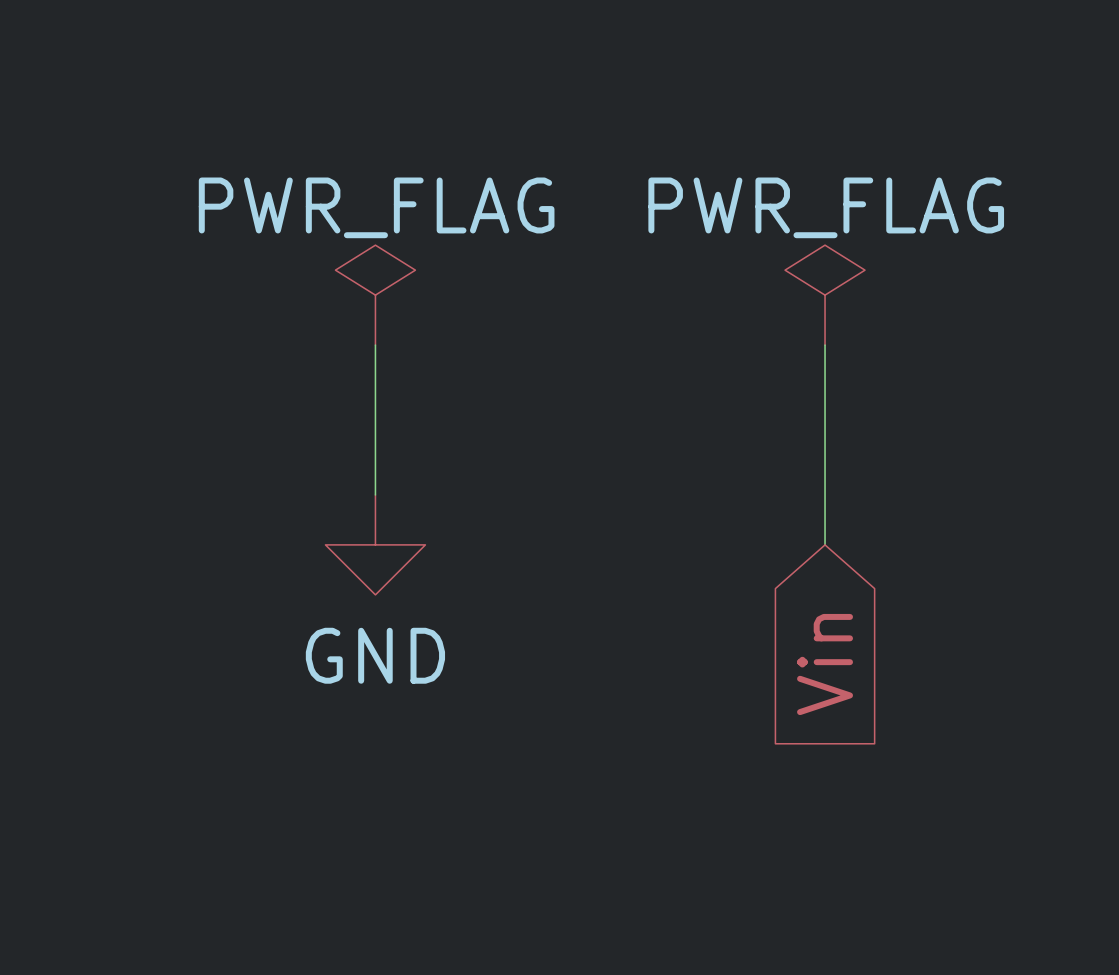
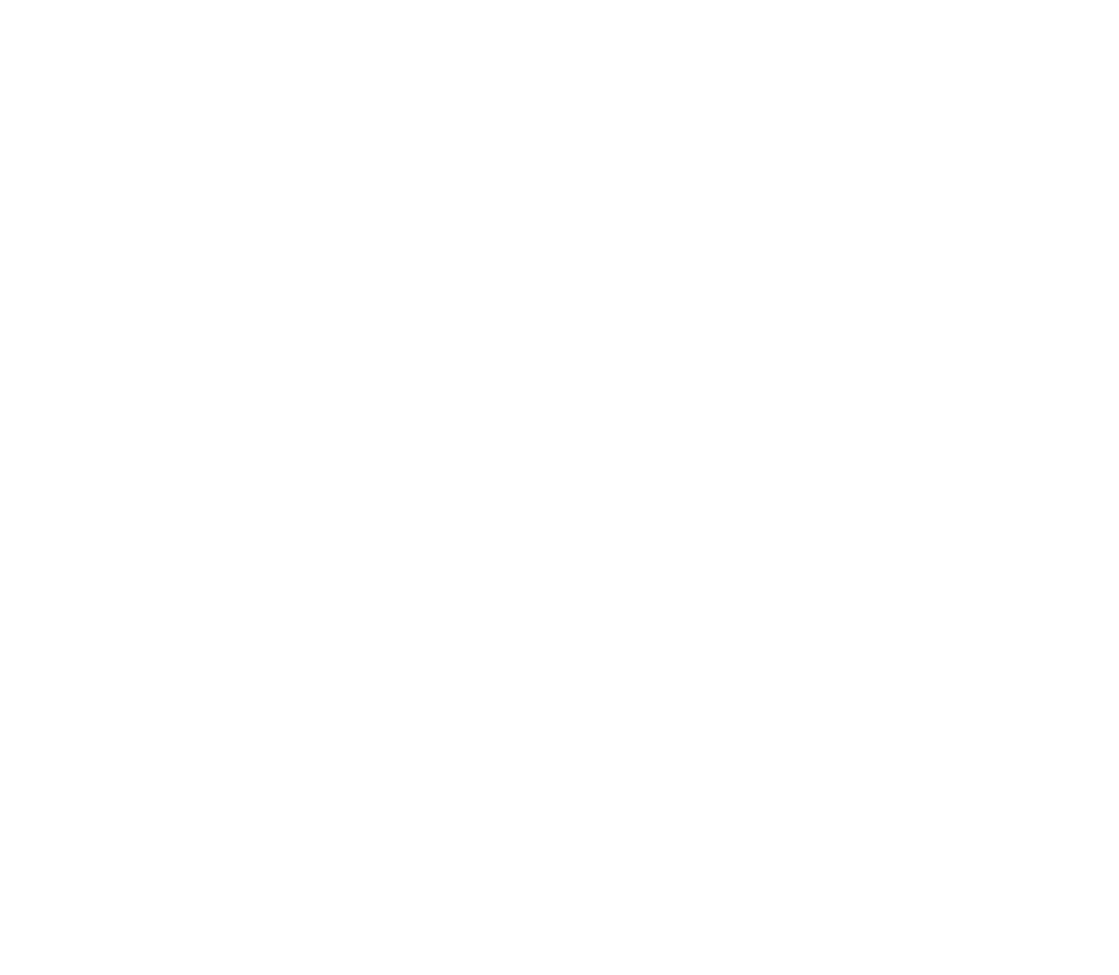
power symbol: PWR_FLAG (375, 295) -> none
power symbol: PWR_FLAG (825, 295) -> none
wire: (375, 345) (375, 494) -> none
wire: (825, 345) (825, 544) -> none
power symbol: GND (375, 544) -> none
global label: Vin (825, 664) -> none

